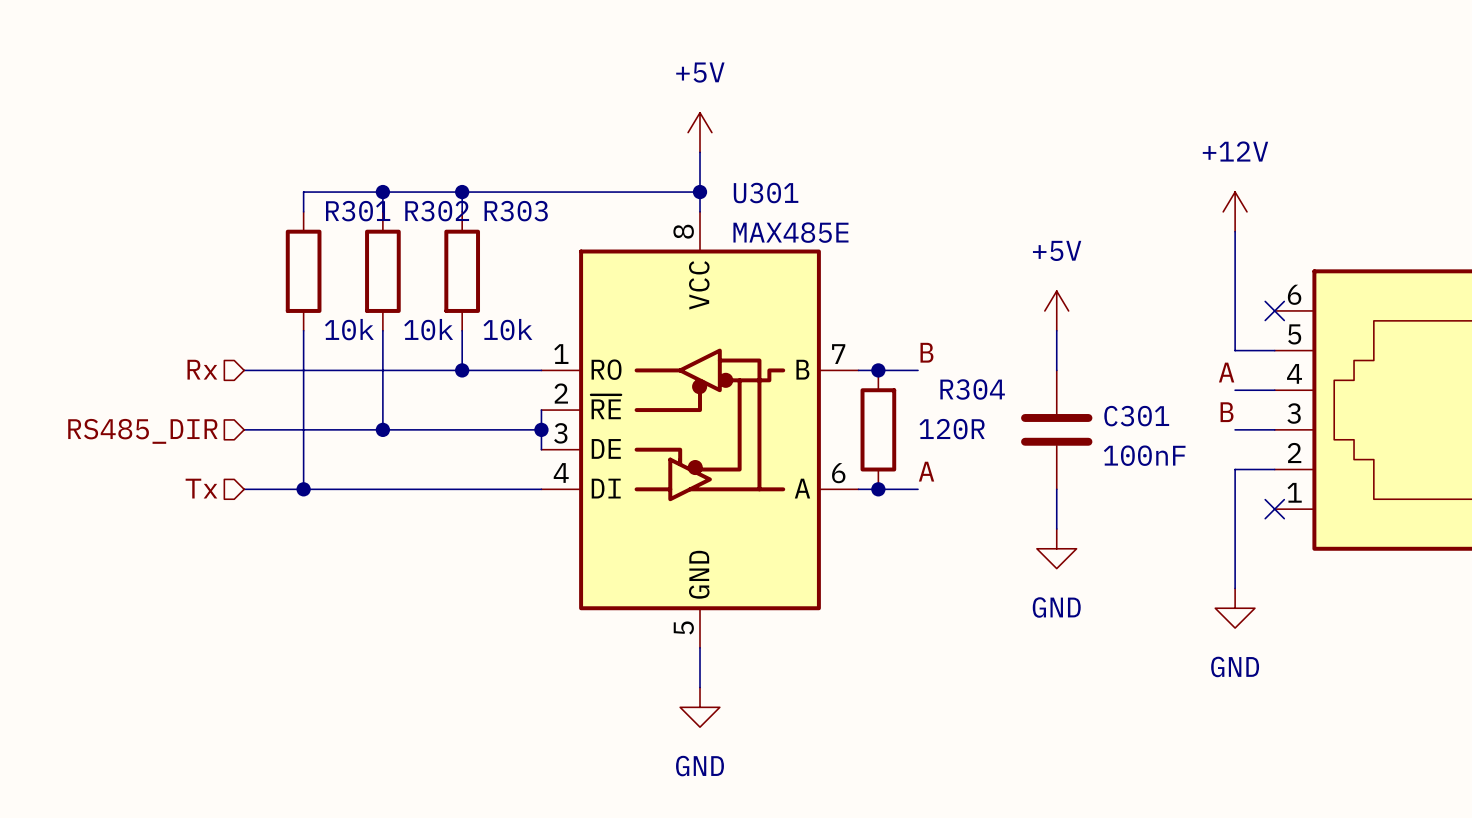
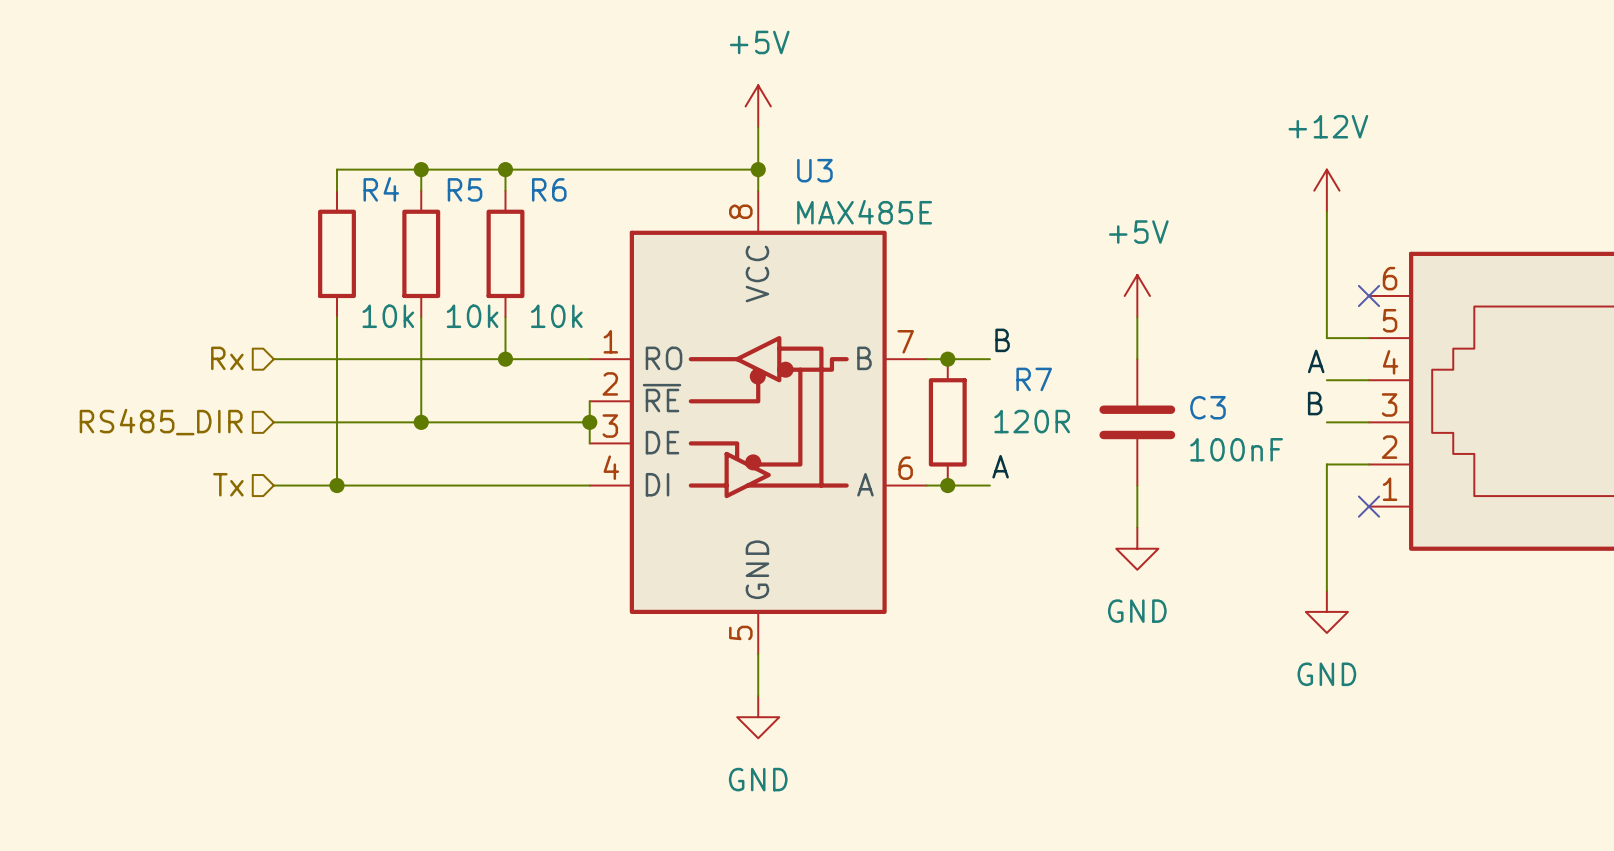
U301 name: U301 (766, 193) -> U3 (814, 170)
R301 name: R301 (358, 211) -> R4 (381, 189)
R302 name: R302 (437, 211) -> R5 (465, 189)
R303 name: R303 (516, 211) -> R6 (549, 189)
R304 name: R304 (972, 389) -> R7 (1034, 379)
C301 name: C301 (1136, 416) -> C3 (1207, 407)

